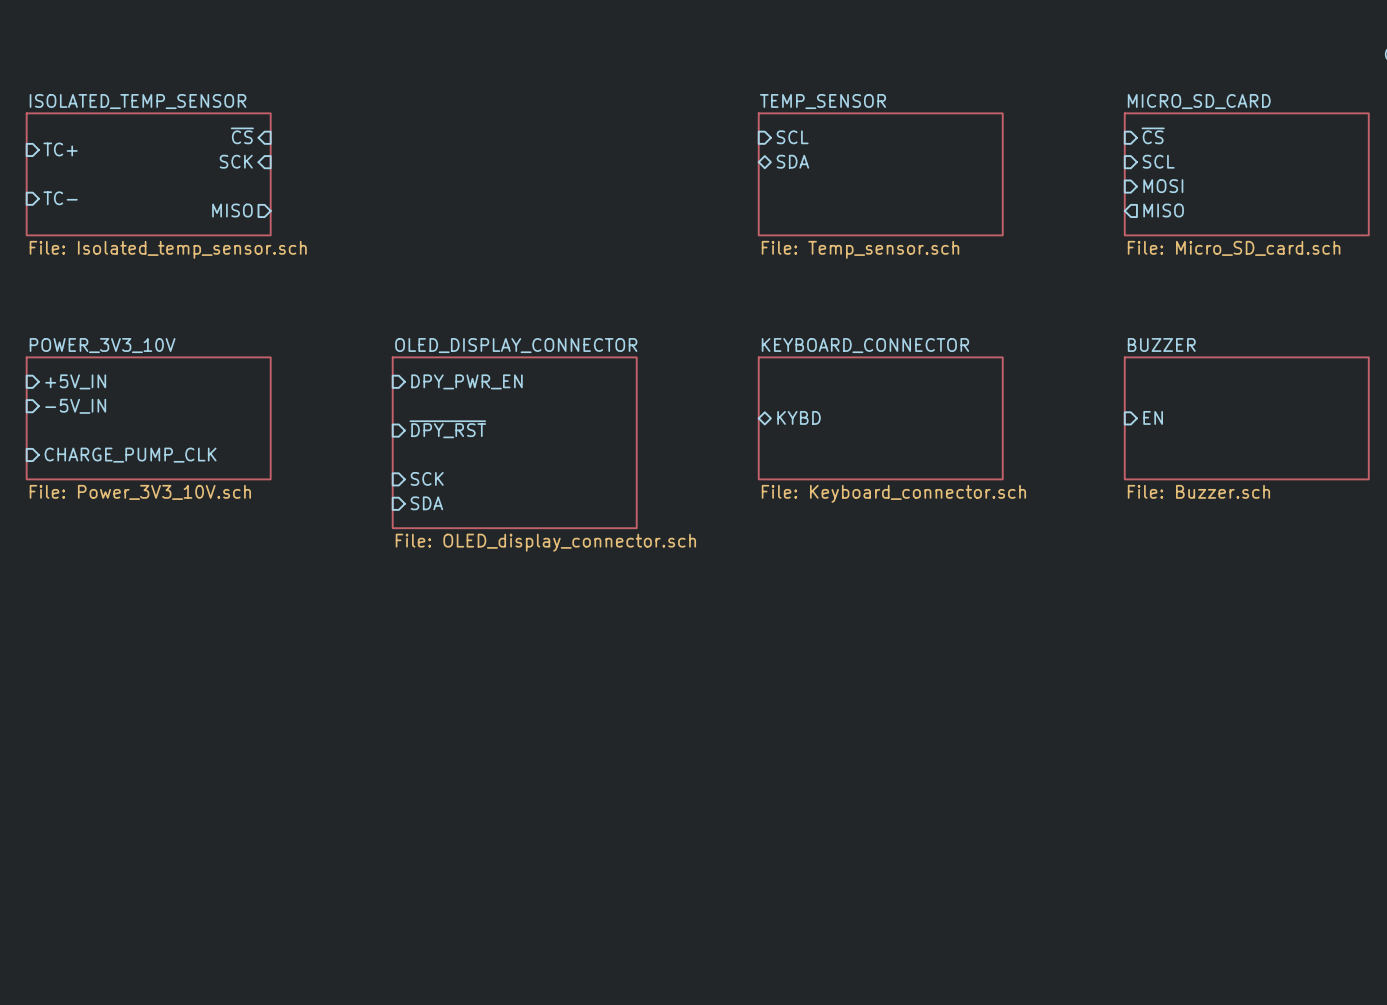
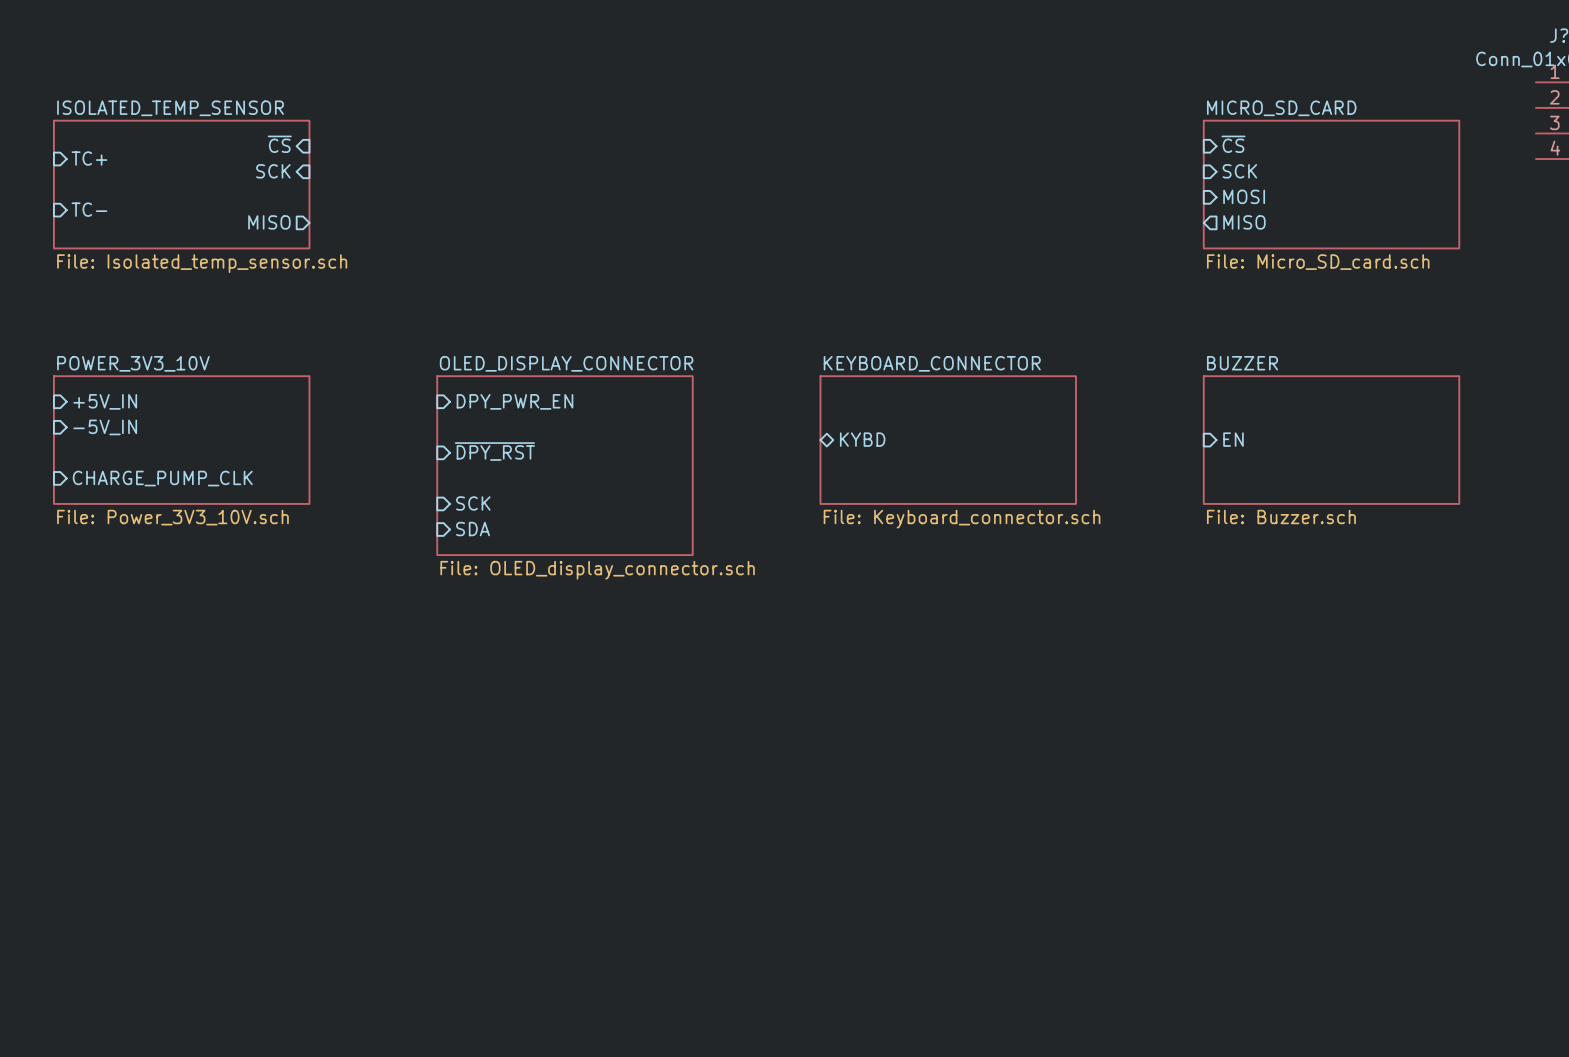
sheet pin: SCL (792, 137) -> none
sheet pin: SDA (792, 161) -> none
sheet pin: SCL (1158, 161) -> SCK (1239, 171)
sheet TEMP_SENSOR: File: Temp_sensor.sch (880, 174) -> none

